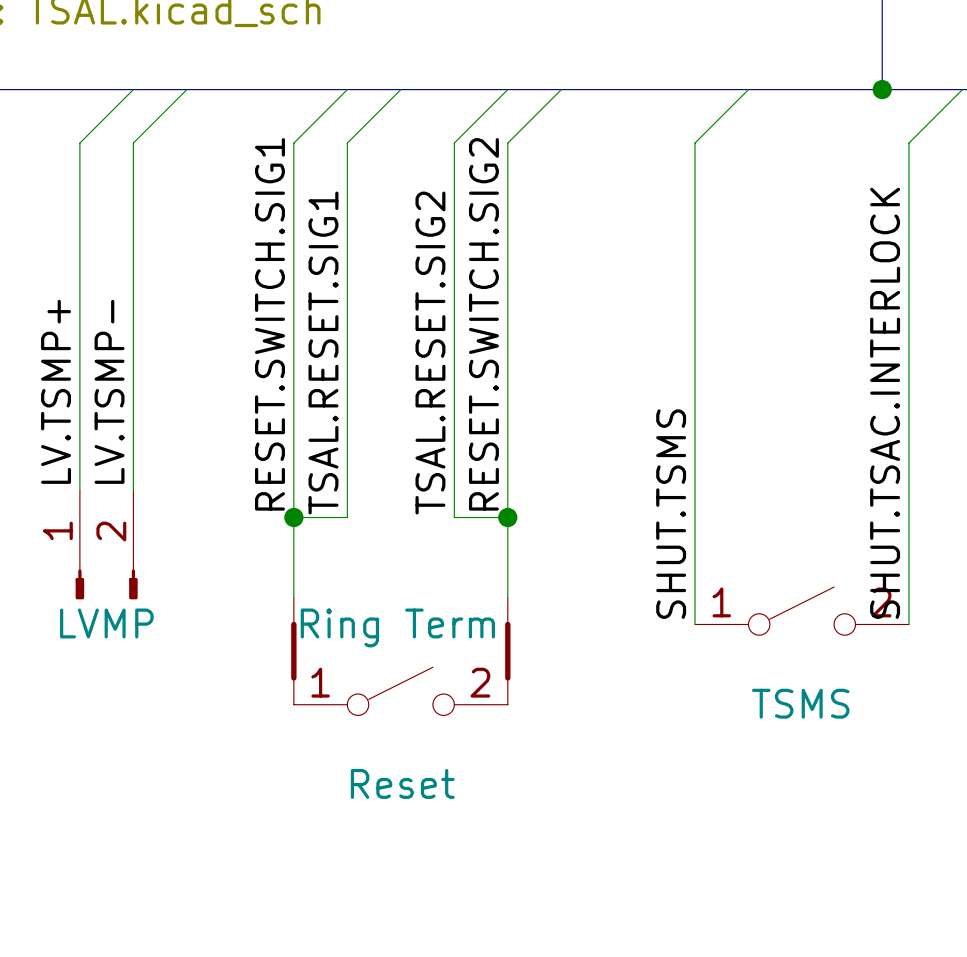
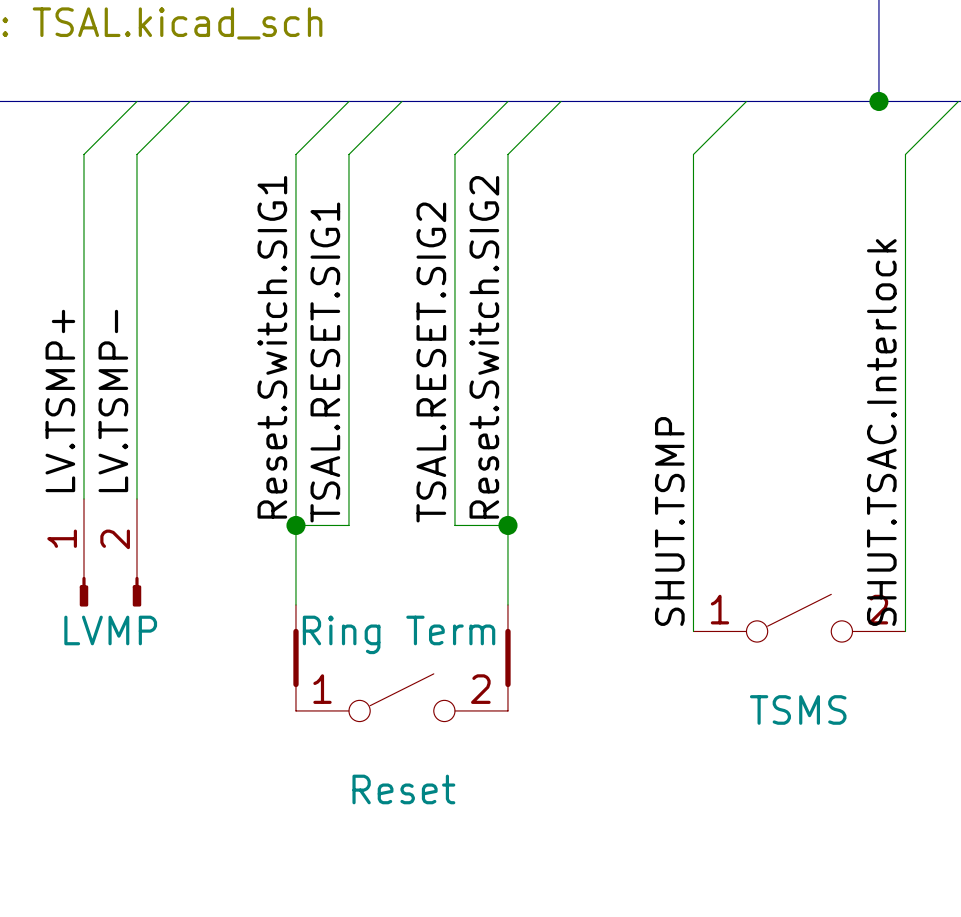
label: RESET.SWITCH.SIG1 (269, 324) -> Reset.Switch.SIG1 (272, 347)
label: RESET.SWITCH.SIG2 (483, 324) -> Reset.Switch.SIG2 (484, 347)
label: SHUT.TSAC.INTERLOCK (885, 403) -> SHUT.TSAC.Interlock (881, 432)
label: SHUT.TSMS (671, 514) -> SHUT.TSMP (669, 521)

